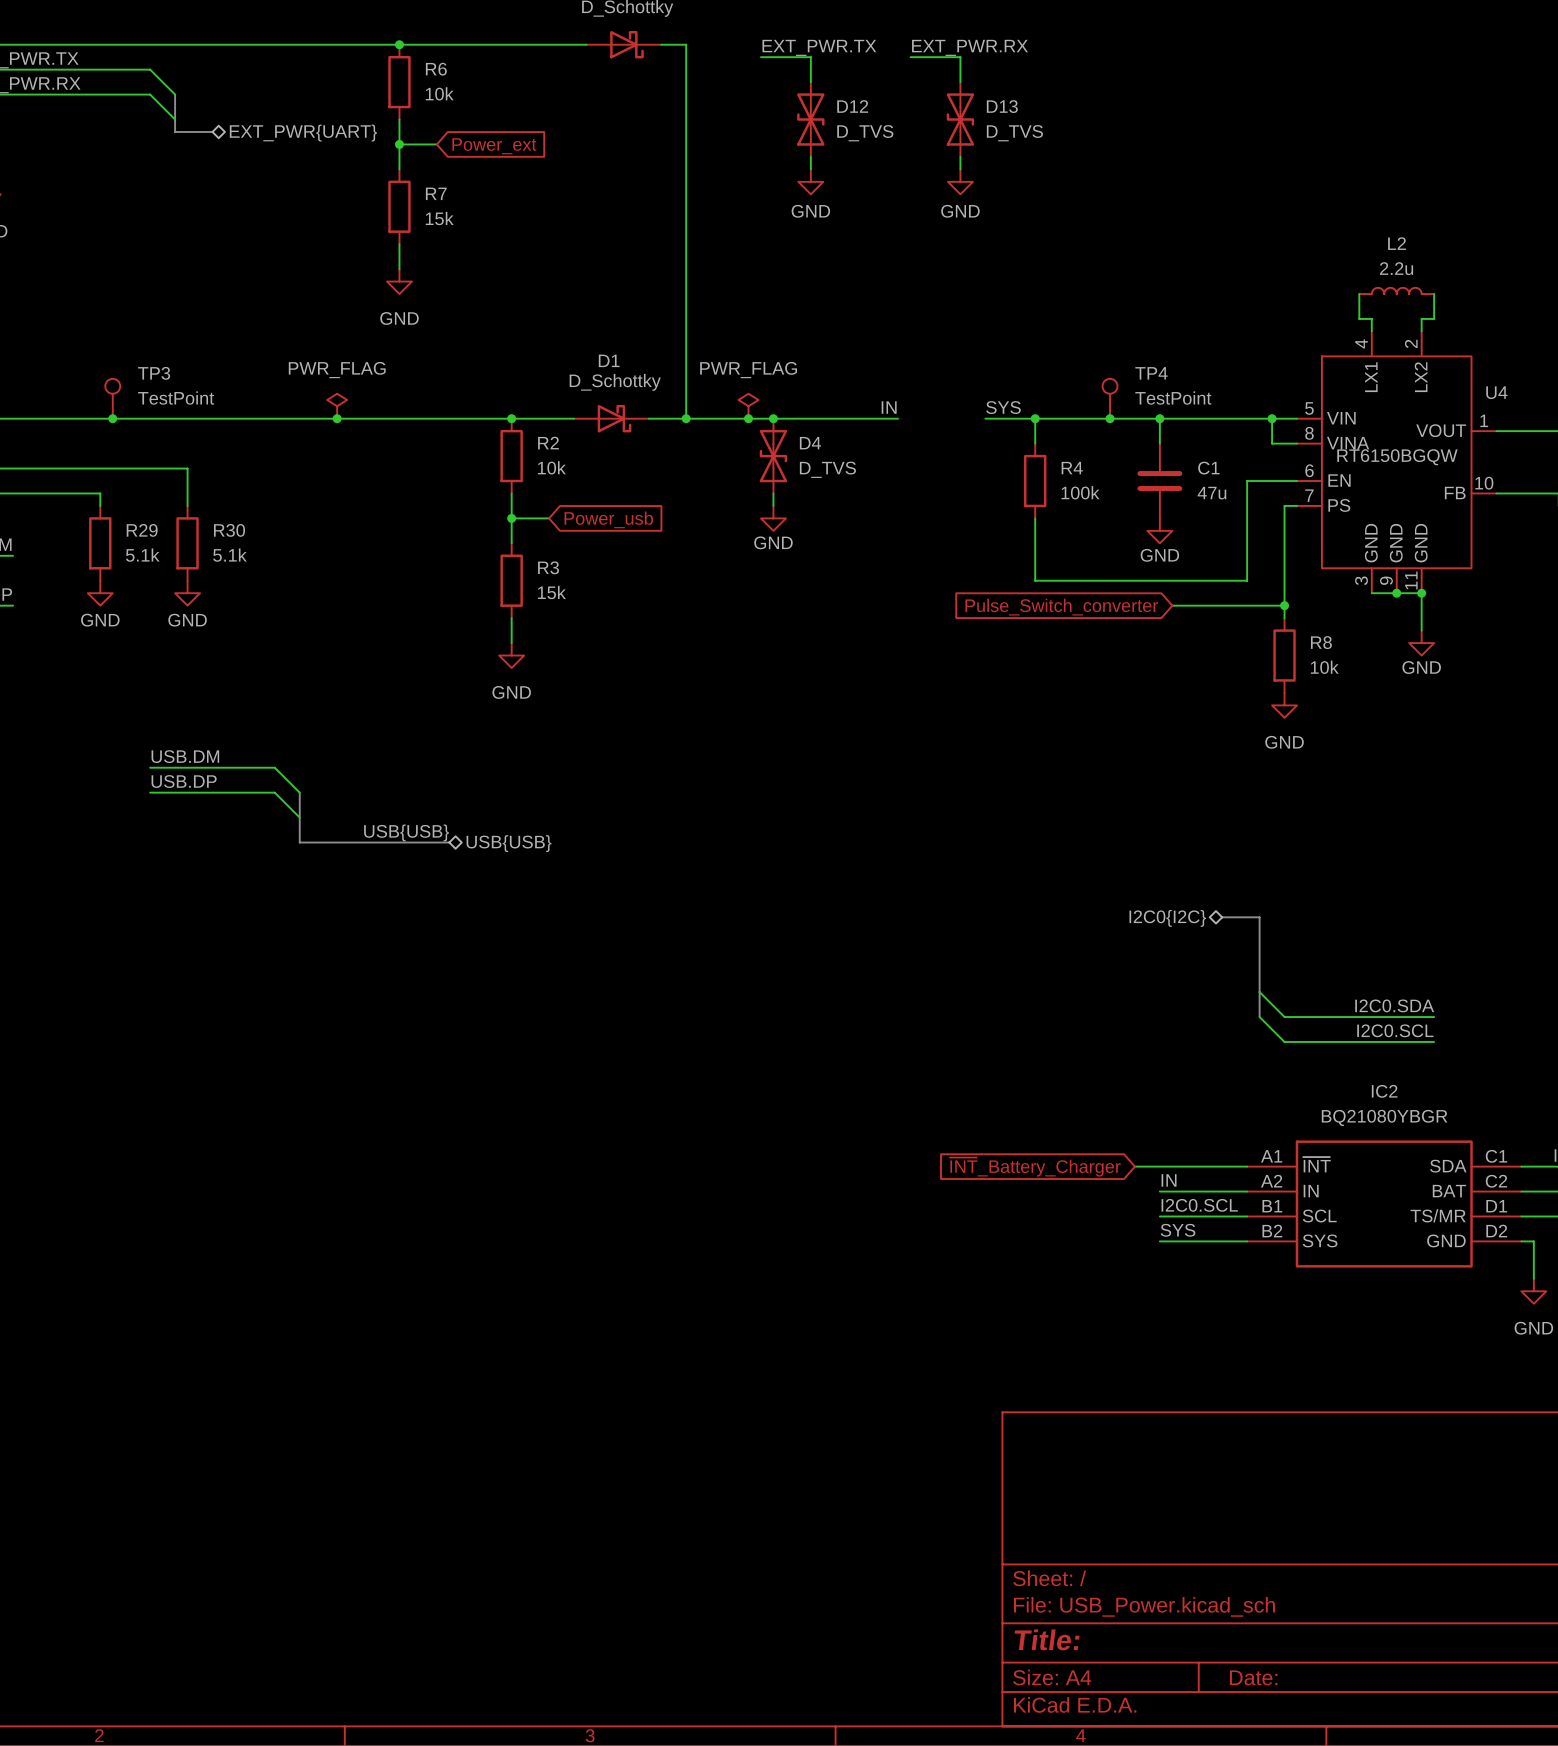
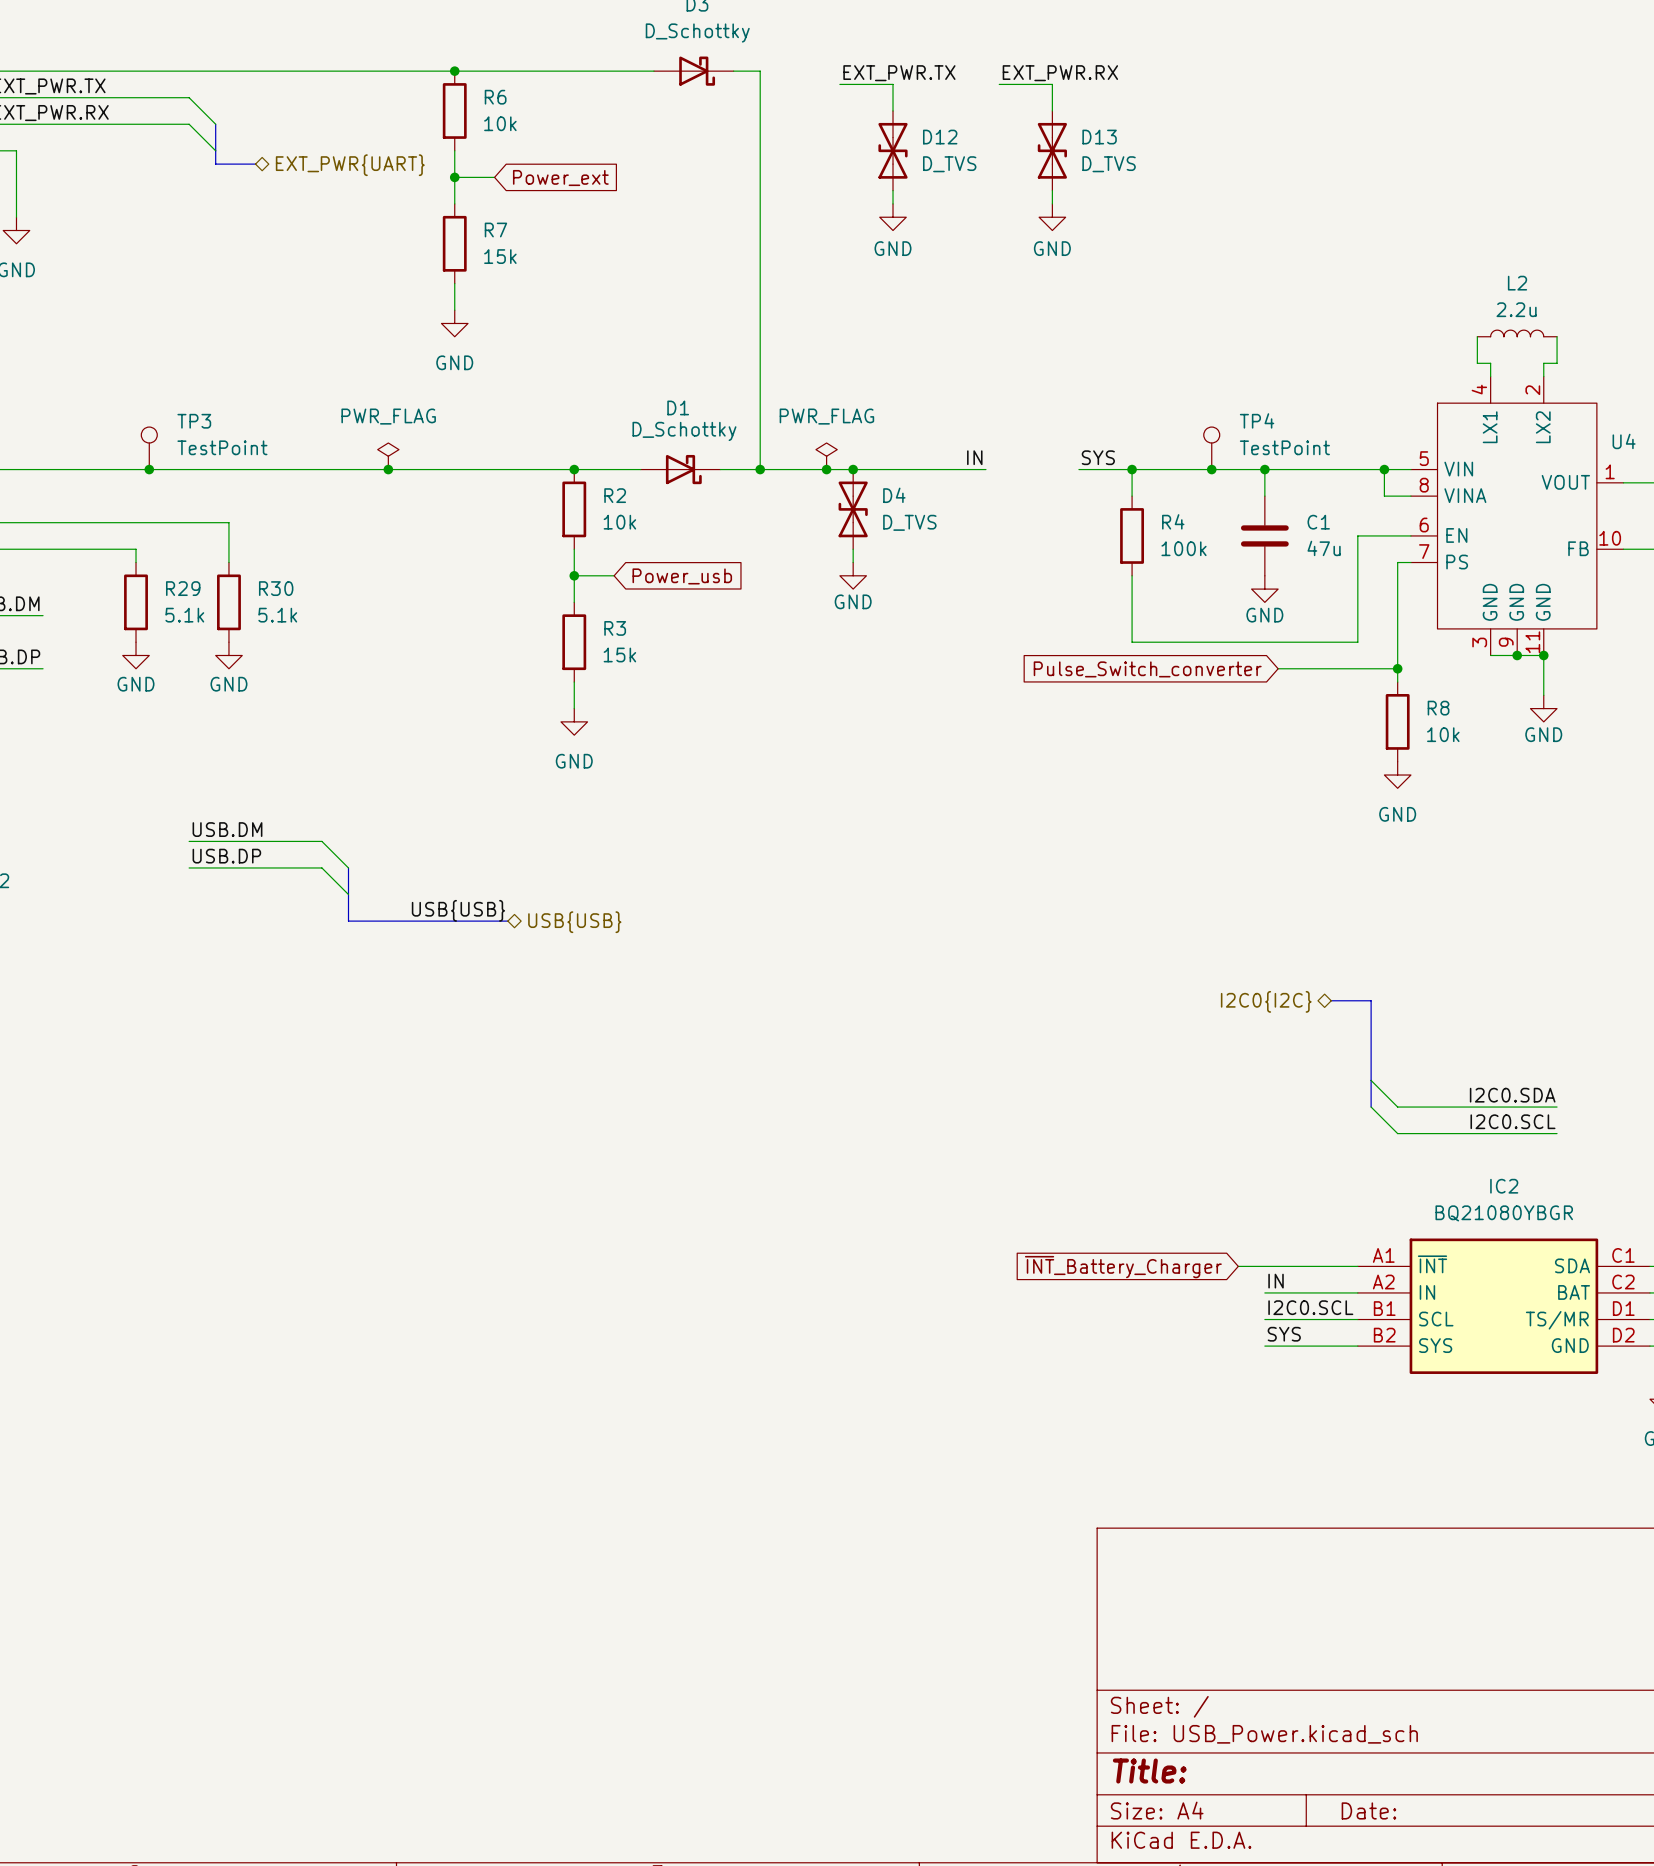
U4 value: RT6150BGQW (1397, 457) -> none

